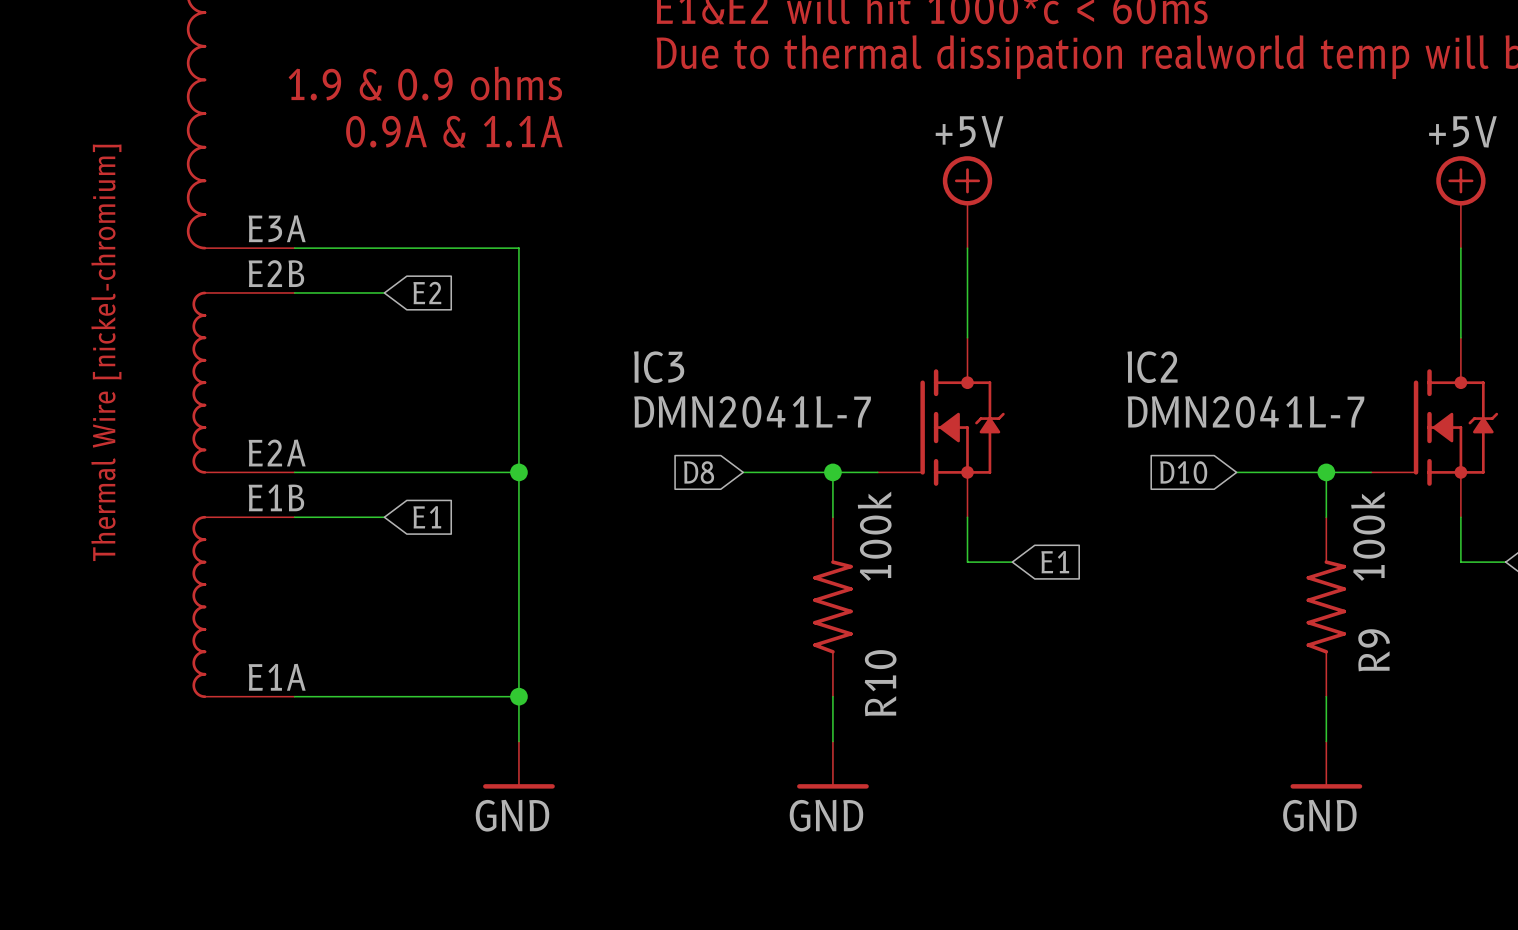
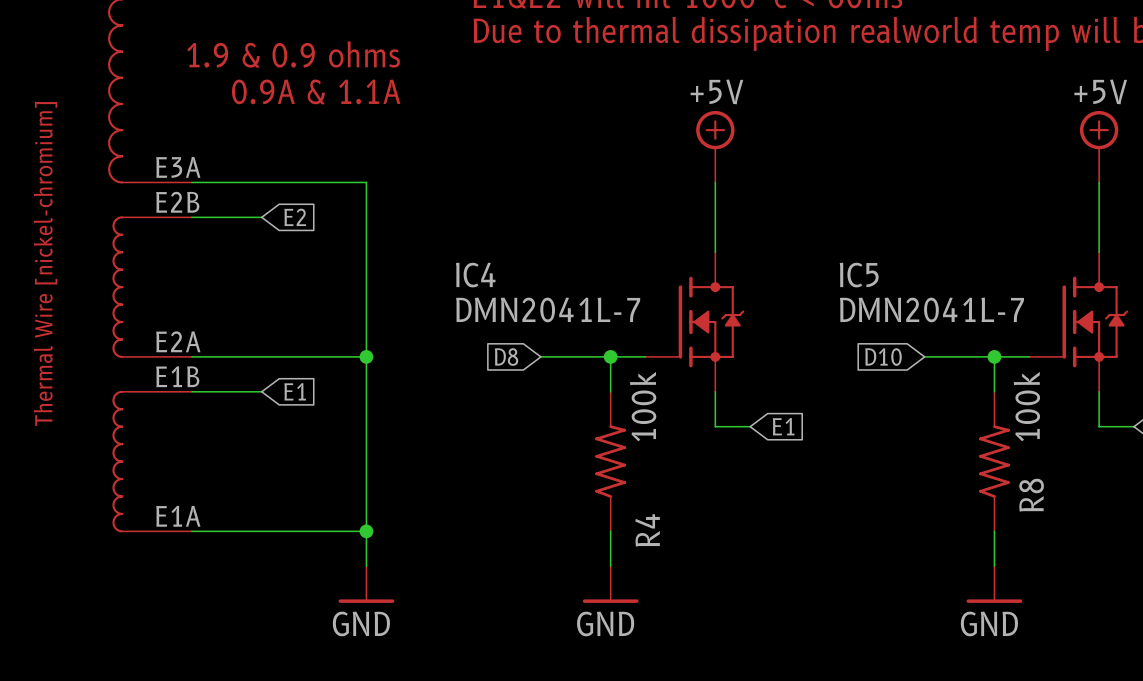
IC3 name: IC3 (659, 367) -> IC4 (475, 275)
IC2 name: IC2 (1152, 367) -> IC5 (859, 275)
R9 name: R9 (1374, 650) -> R8 (1031, 495)
R10 name: R10 (880, 683) -> R4 (647, 530)

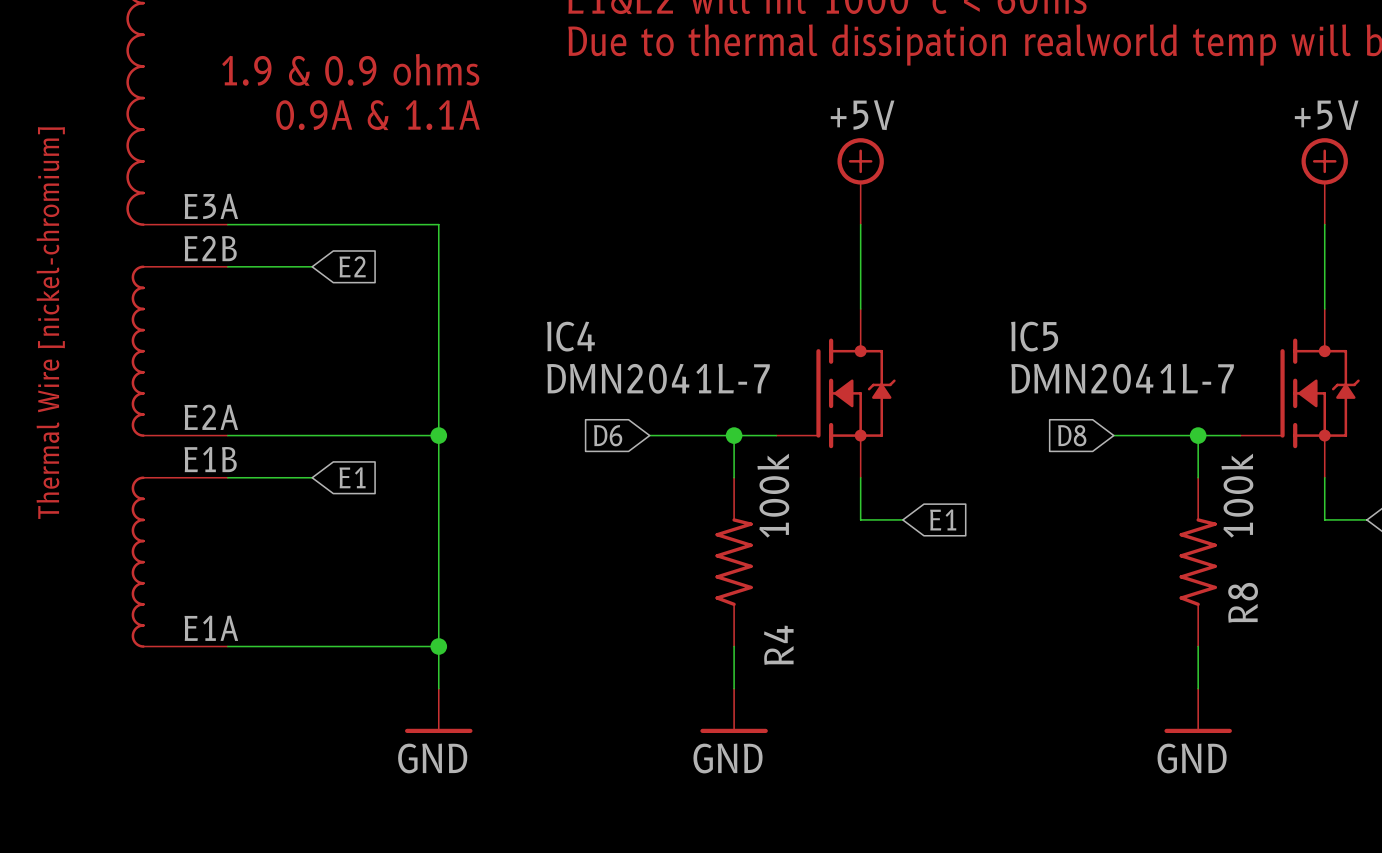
global label: D8 (506, 357) -> D6 (608, 435)
global label: D10 (883, 357) -> D8 (1072, 435)

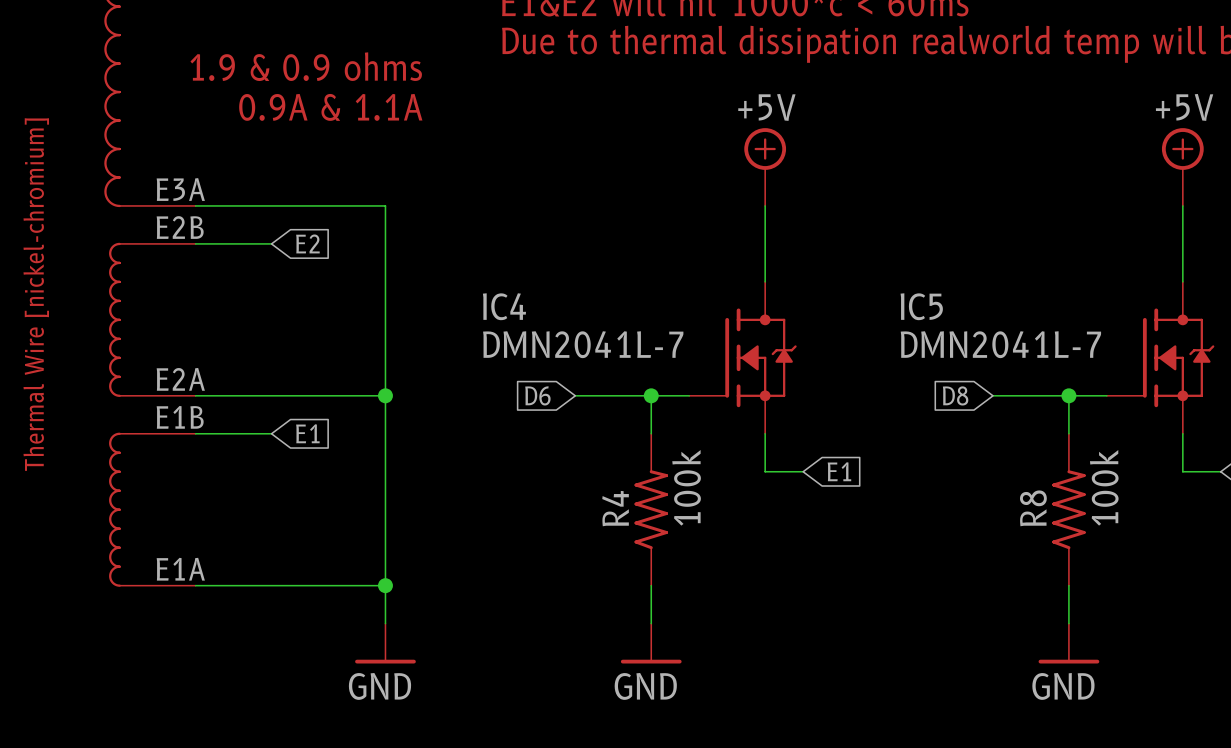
R4 value position: 100k (773, 495) -> 100k (686, 487)
R8 value position: 100k (1237, 495) -> 100k (1104, 487)
R8 name position: R8 (1243, 602) -> R8 (1033, 508)
R4 name position: R4 (778, 645) -> R4 (615, 508)

